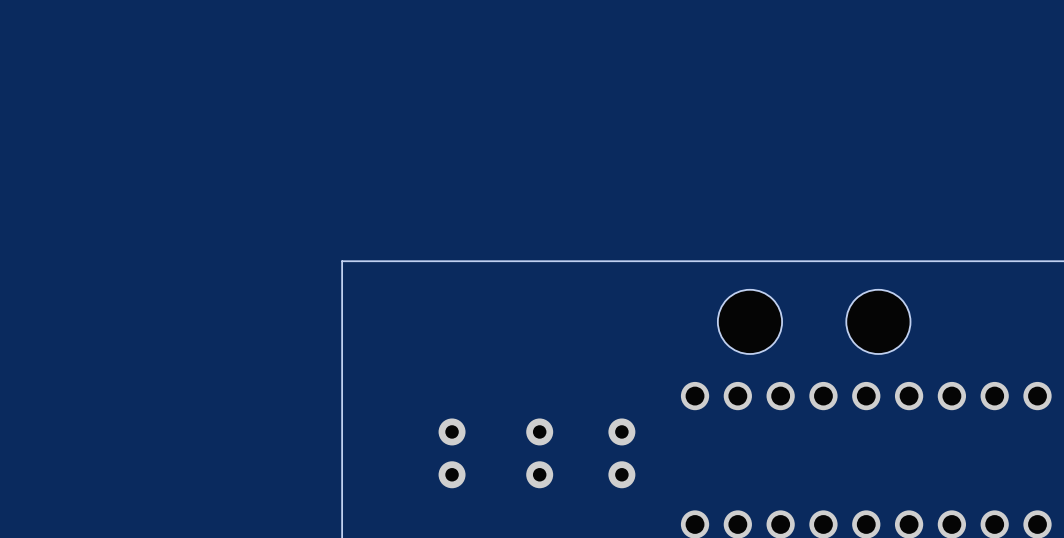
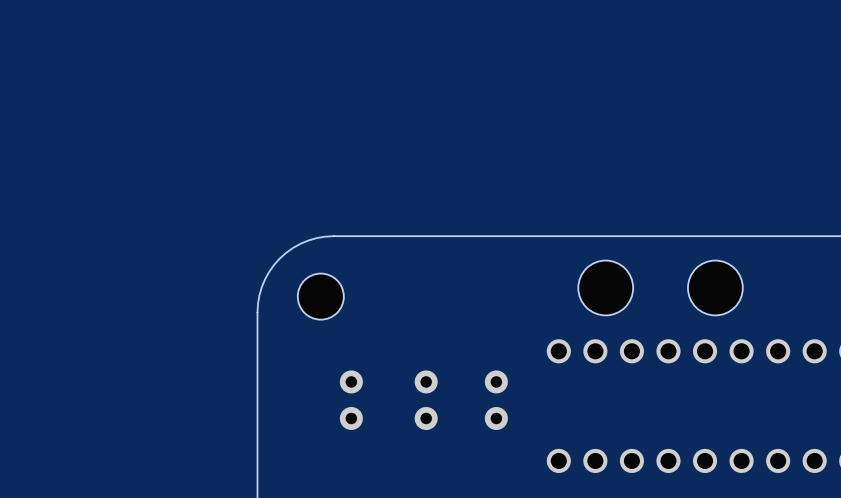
board edge: (431, 261) (342, 261) (342, 350) -> (333, 236) (316, 238) (300, 243) (279, 258) (269, 271) (261, 287) (257, 312)
part: none -> (320, 296)

